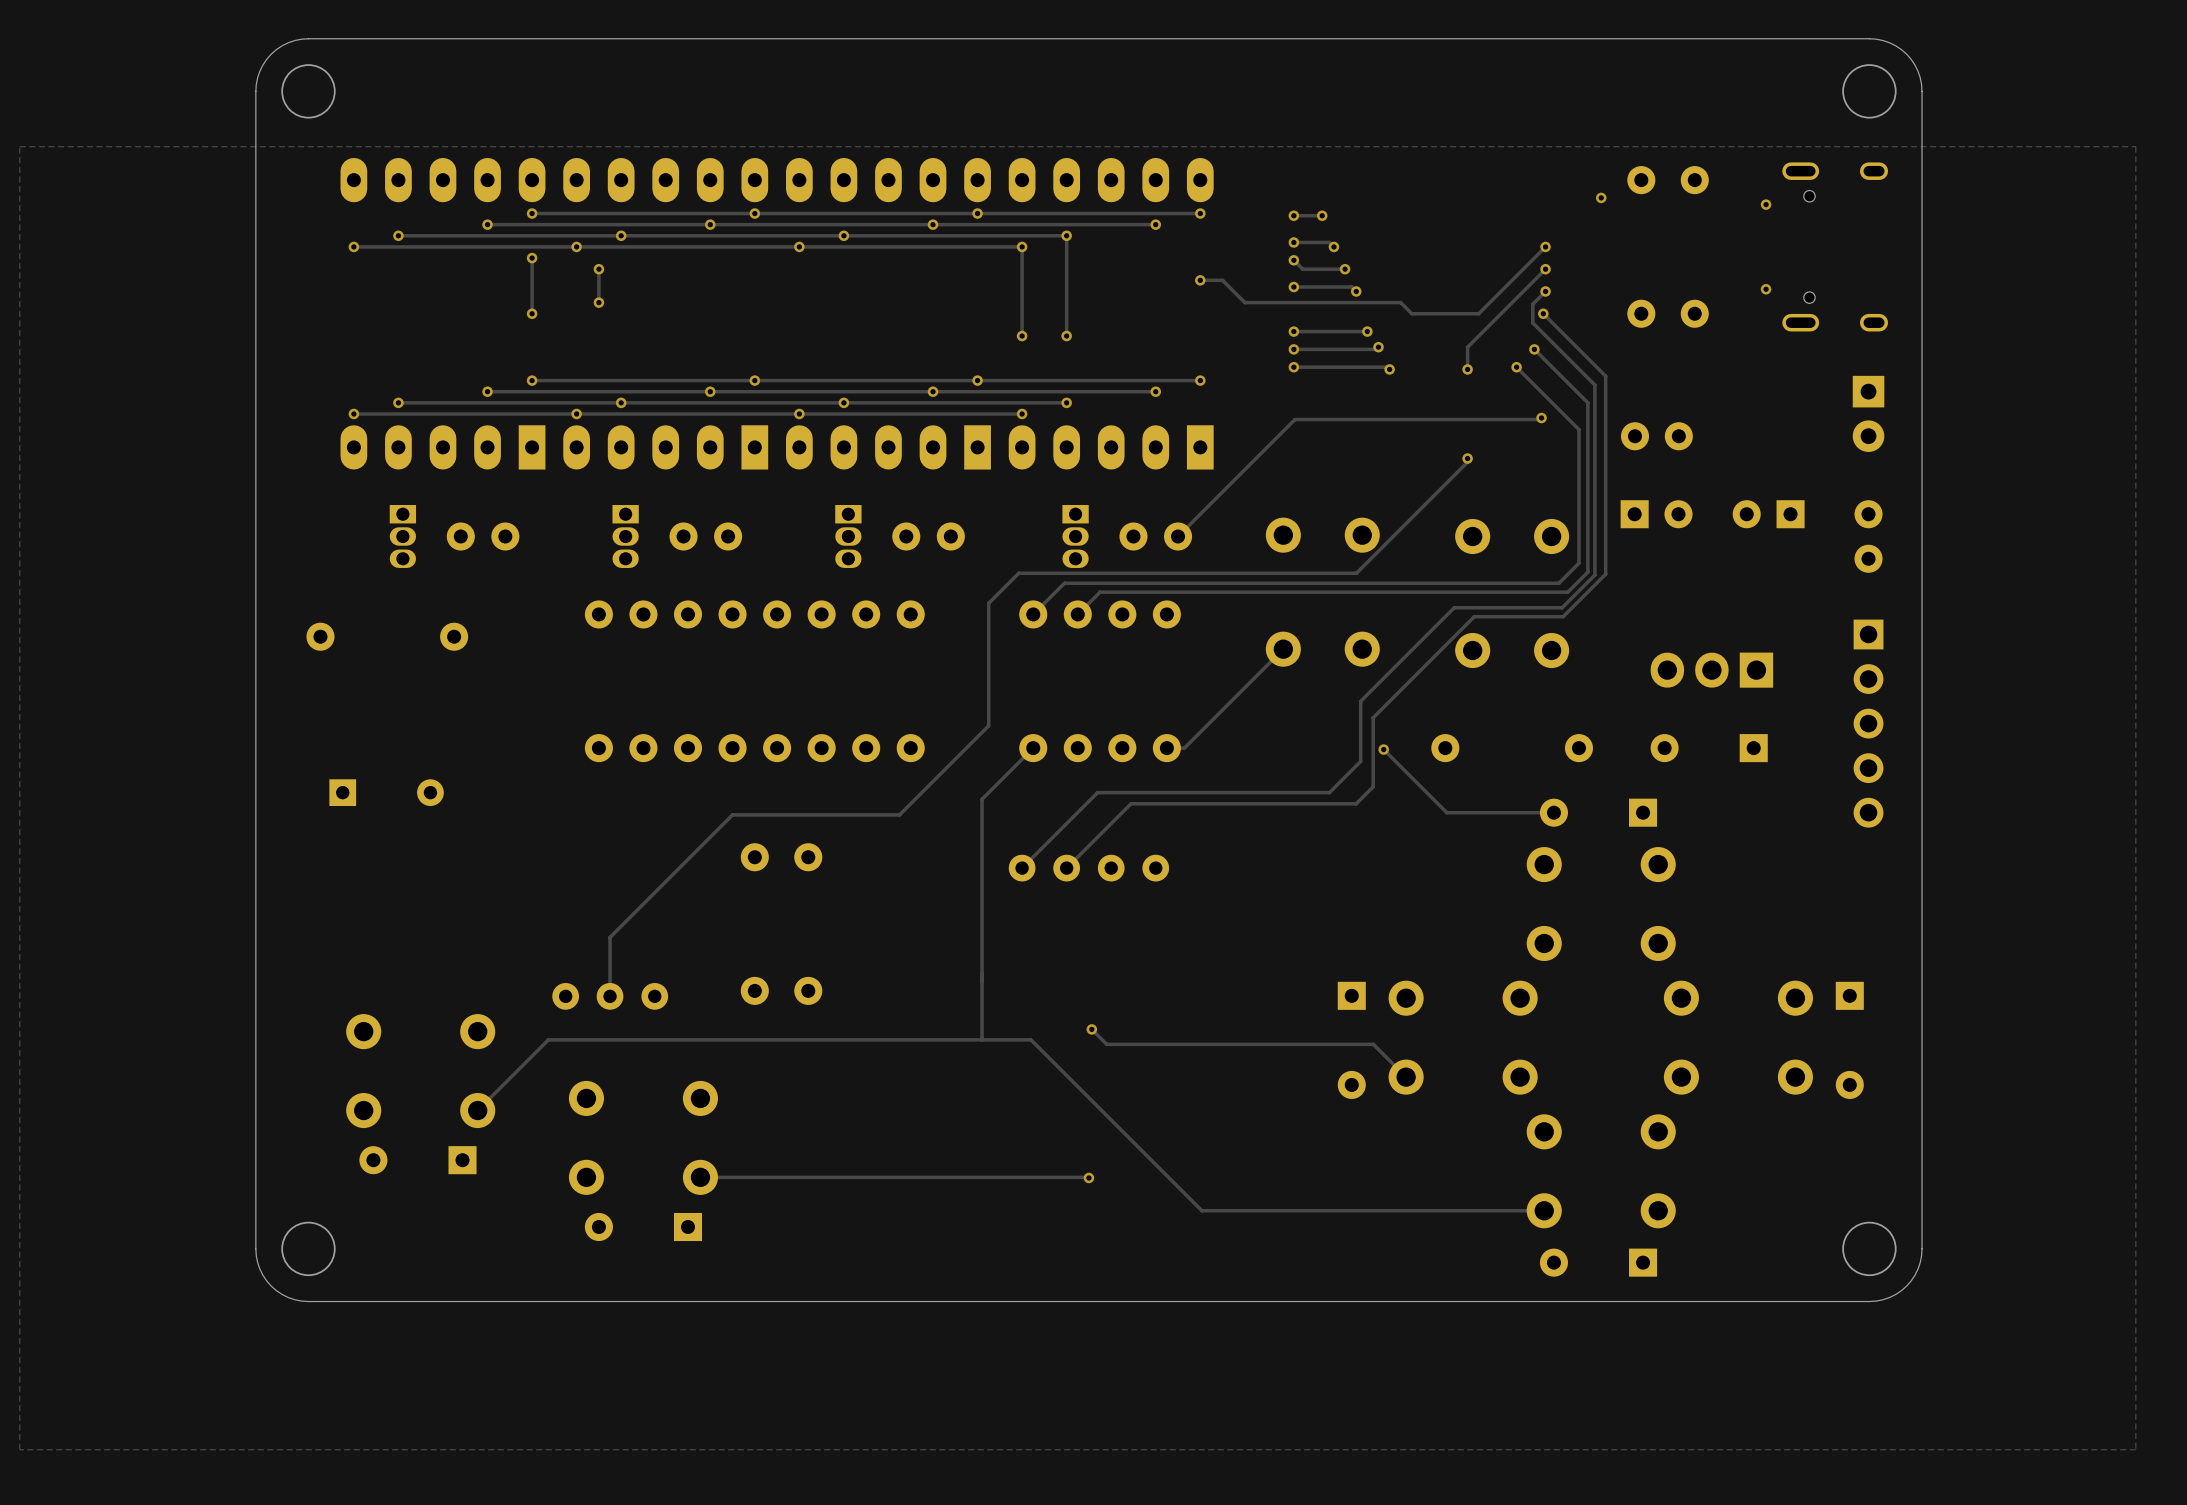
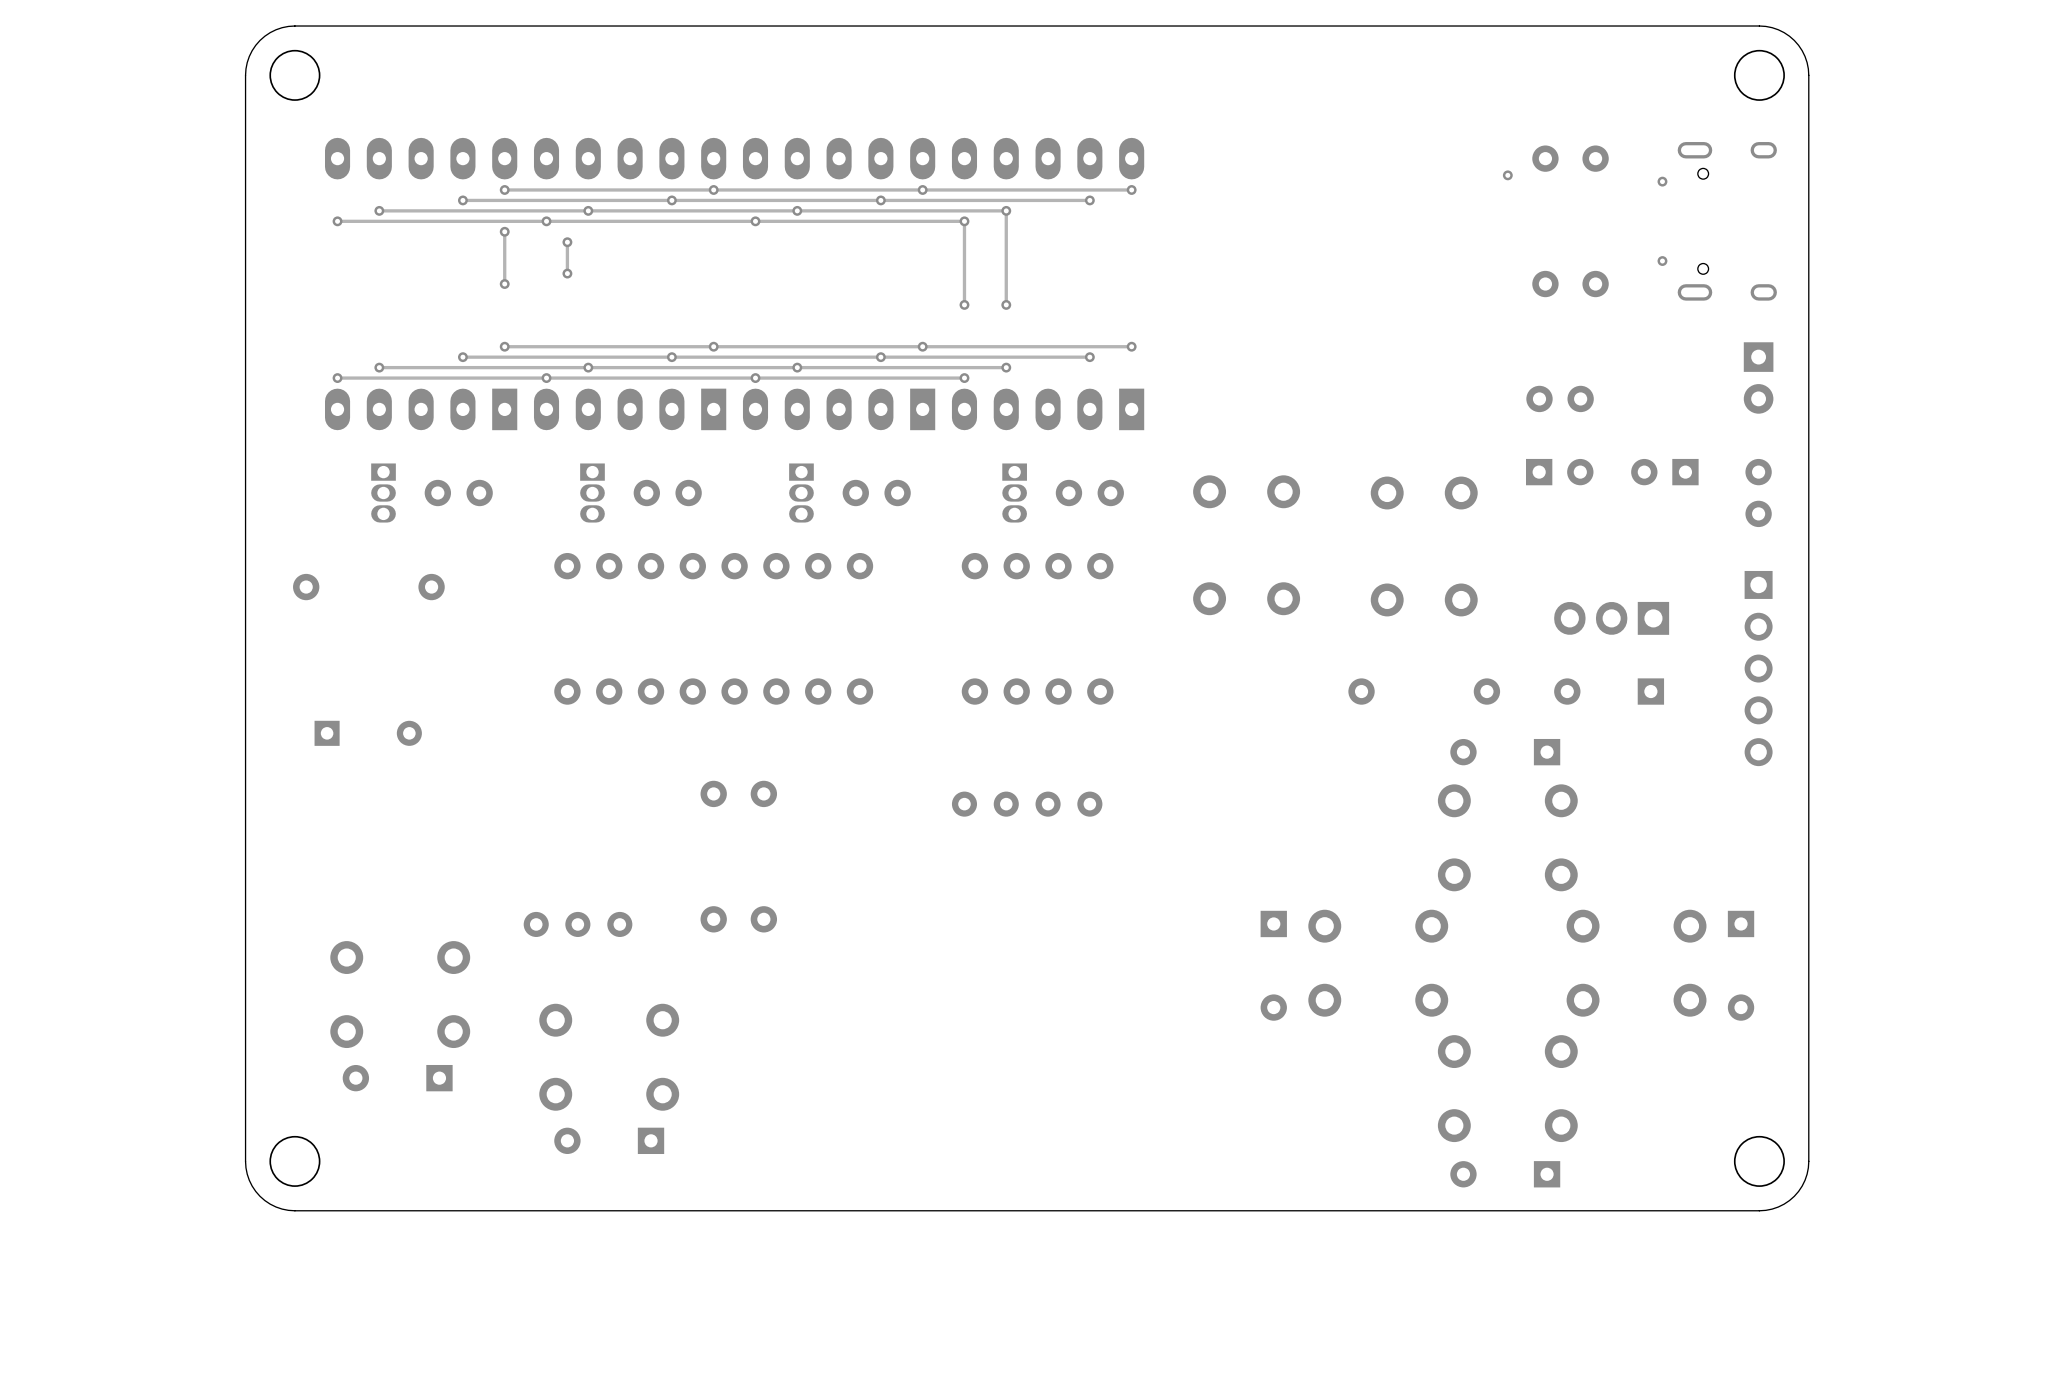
zone outline: (2135, 146) (2135, 1449) (19, 1449) (19, 146) (2135, 146) -> none
via: (1293, 215) -> none
track: (1322, 215) (1293, 215) -> none
via: (1322, 215) -> none
track: (1293, 242) (1329, 242) (1333, 246) -> none
via: (1293, 242) -> none
via: (1333, 246) -> none
track: (1545, 246) (1478, 313) (1411, 313) (1400, 302) (1244, 302) (1222, 280) (1200, 280) -> none
via: (1545, 246) -> none
track: (1293, 260) (1302, 269) (1345, 269) -> none
via: (1293, 260) -> none
via: (1345, 269) -> none
track: (1545, 269) (1467, 347) (1467, 369) -> none
via: (1545, 269) -> none
via: (1200, 280) -> none
track: (1293, 287) (1351, 287) (1356, 291) -> none
via: (1293, 287) -> none
via: (1356, 291) -> none
track: (1545, 291) (1532, 304) (1532, 322) (1594, 385) (1594, 575) (1562, 607) (1454, 607) (1360, 701) (1360, 761) (1329, 792) (1097, 792) (1022, 868) -> none
via: (1545, 291) -> none
track: (1543, 313) (1605, 376) (1605, 574) (1563, 616) (1474, 616) (1373, 717) (1373, 786) (1356, 803) (1130, 803) (1066, 868) -> none
via: (1543, 313) -> none
via: (1293, 331) -> none
track: (1367, 331) (1293, 331) -> none
via: (1367, 331) -> none
track: (1378, 347) (1376, 349) (1293, 349) -> none
via: (1378, 347) -> none
via: (1293, 349) -> none
track: (1534, 349) (1587, 402) (1587, 572) (1567, 592) (1100, 592) (1077, 614) -> none
via: (1534, 349) -> none
track: (1293, 367) (1387, 367) (1389, 369) -> none
via: (1293, 367) -> none
track: (1516, 367) (1578, 429) (1578, 563) (1558, 583) (1064, 583) (1033, 614) -> none
via: (1516, 367) -> none
via: (1389, 369) -> none
via: (1467, 369) -> none
track: (1541, 418) (1539, 419) (1294, 419) (1178, 536) -> none
via: (1541, 418) -> none
track: (1467, 458) (1467, 462) (1356, 573) (1018, 573) (988, 603) (988, 725) (899, 814) (732, 814) (610, 937) (610, 996) -> none
via: (1467, 458) -> none
track: (1283, 649) (1184, 748) (1166, 748) -> none
track: (1033, 748) (982, 799) (982, 1039) -> none
track: (1383, 749) (1446, 812) (1553, 812) -> none
via: (1383, 749) -> none
track: (1091, 1029) (1106, 1044) (1373, 1044) (1406, 1077) -> none
via: (1091, 1029) -> none
track: (477, 1110) (548, 1039) (1031, 1039) (1201, 1210) (1544, 1210) -> none
track: (700, 1177) (1088, 1177) -> none
via: (1088, 1177) -> none

